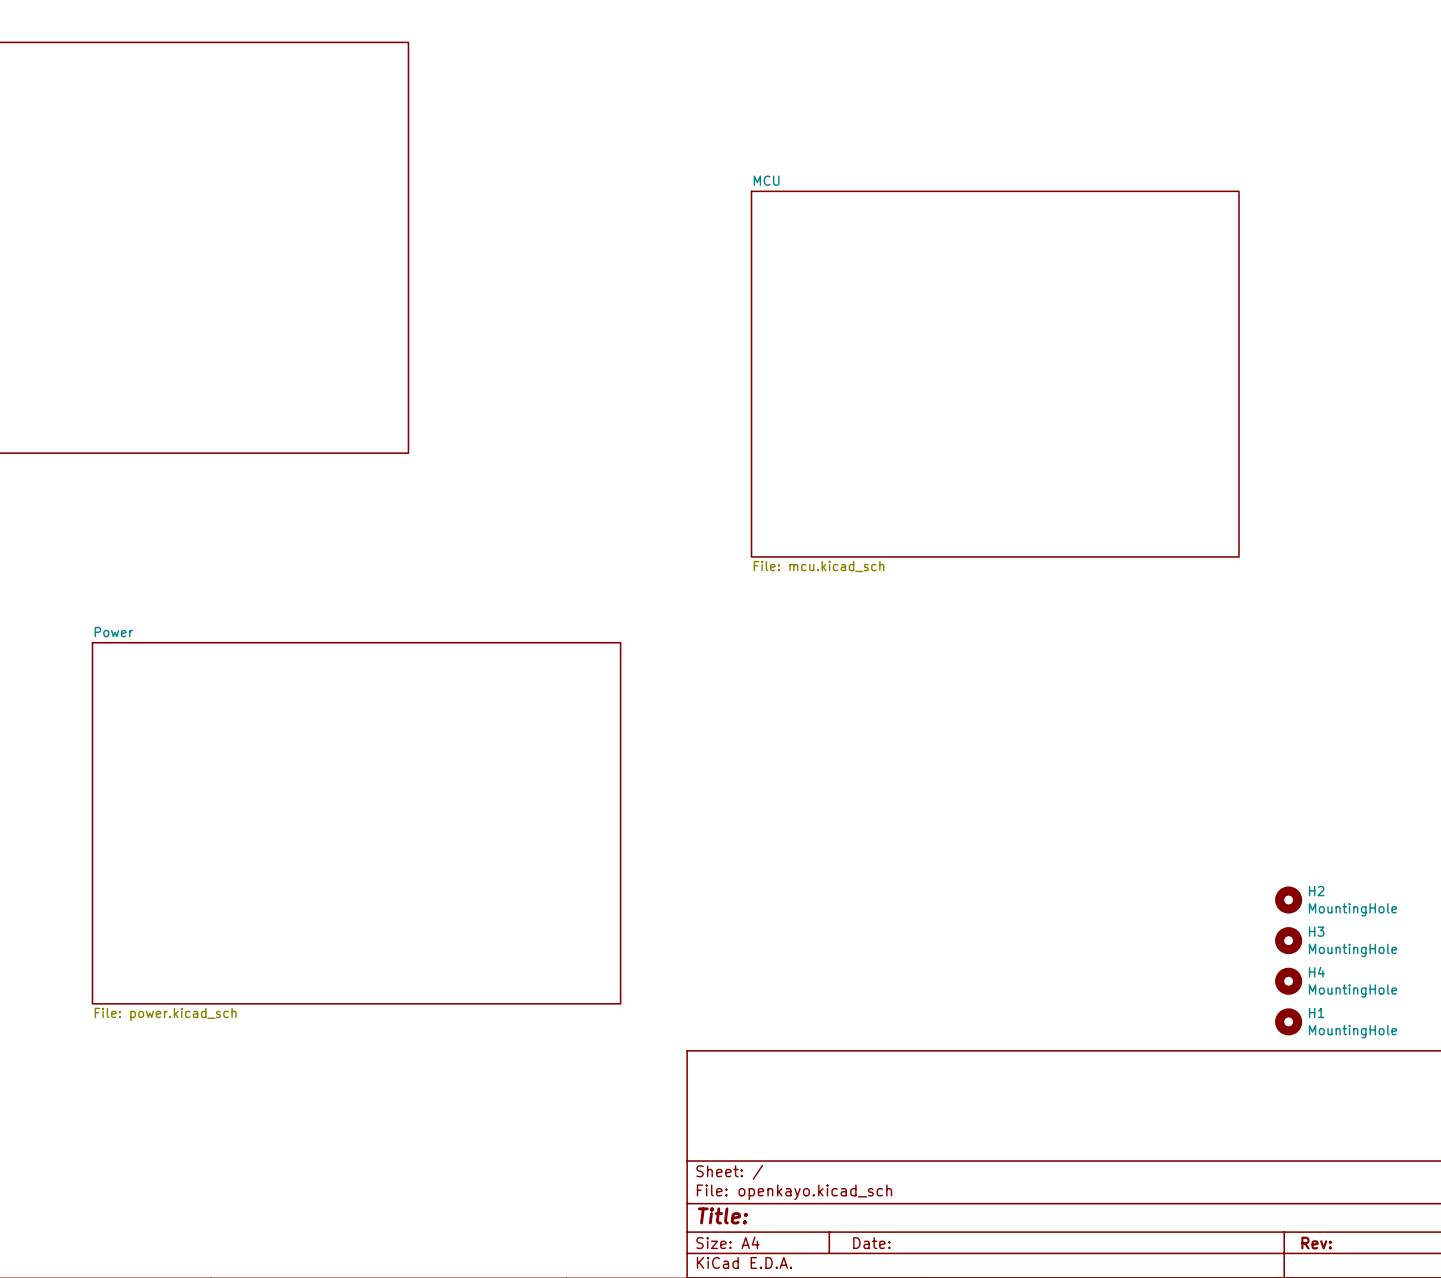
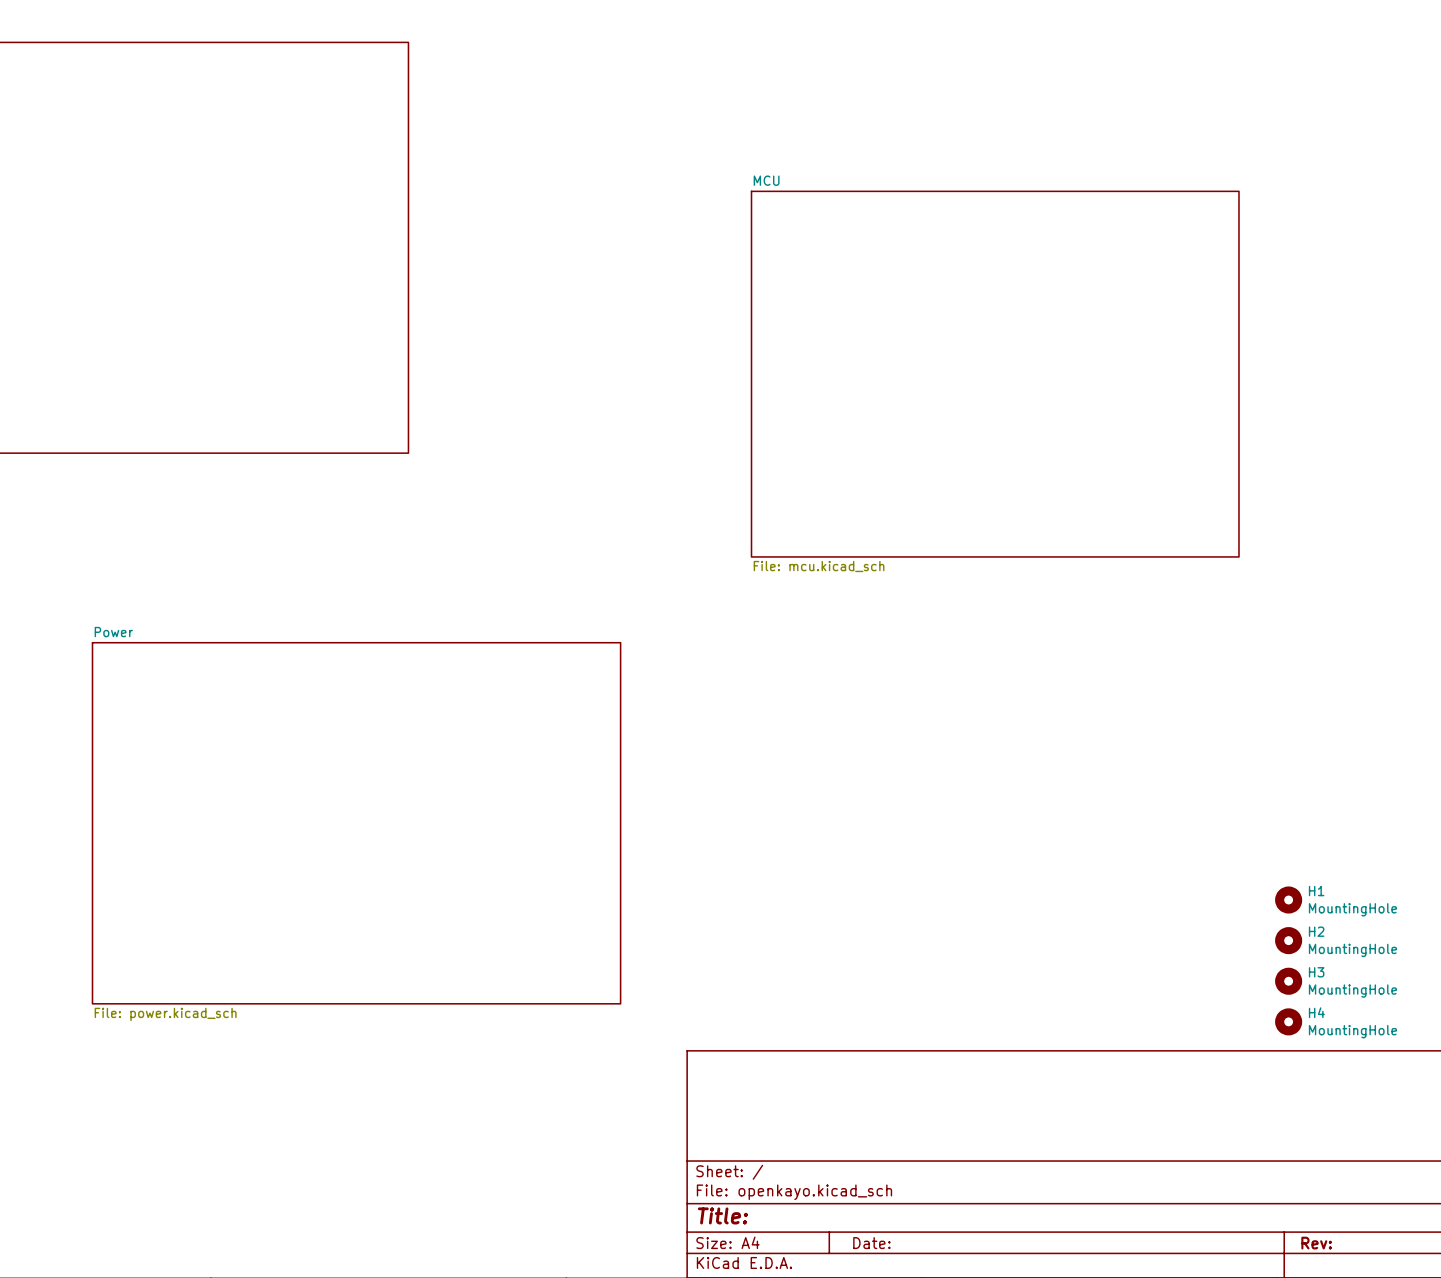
H2 name: H2 (1316, 891) -> H1 (1316, 891)
H3 name: H3 (1316, 931) -> H2 (1316, 931)
H4 name: H4 (1316, 972) -> H3 (1316, 972)
H1 name: H1 (1316, 1012) -> H4 (1316, 1012)

